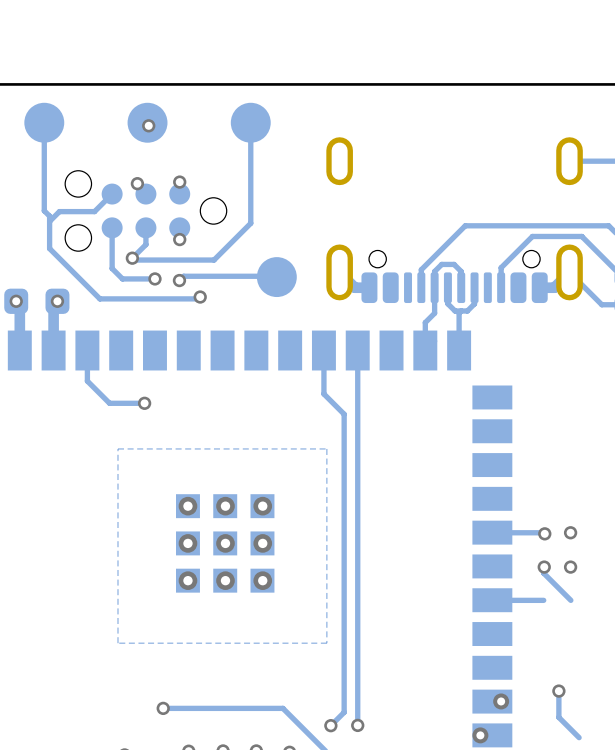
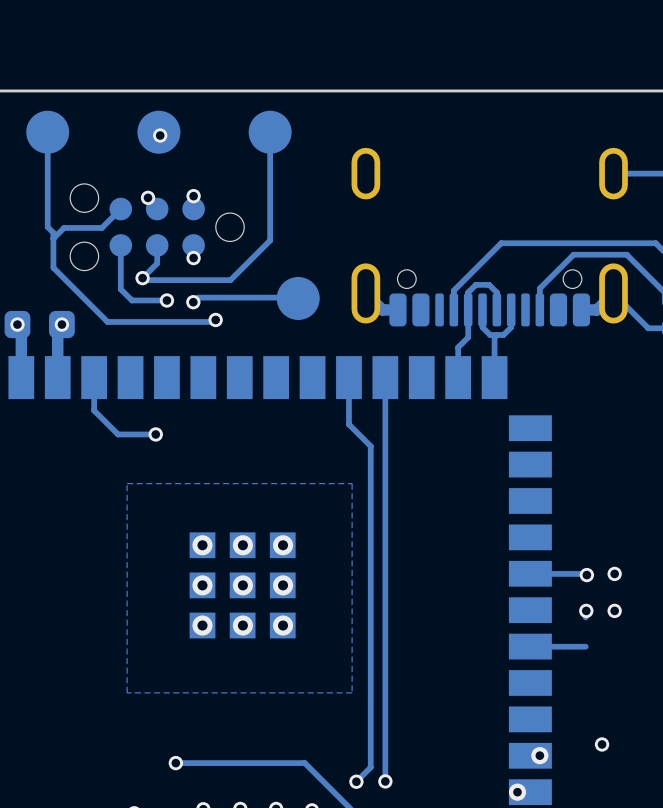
bottom track: (543, 573) (570, 600) -> none
bottom track: (558, 691) (558, 717) (579, 737) -> none

